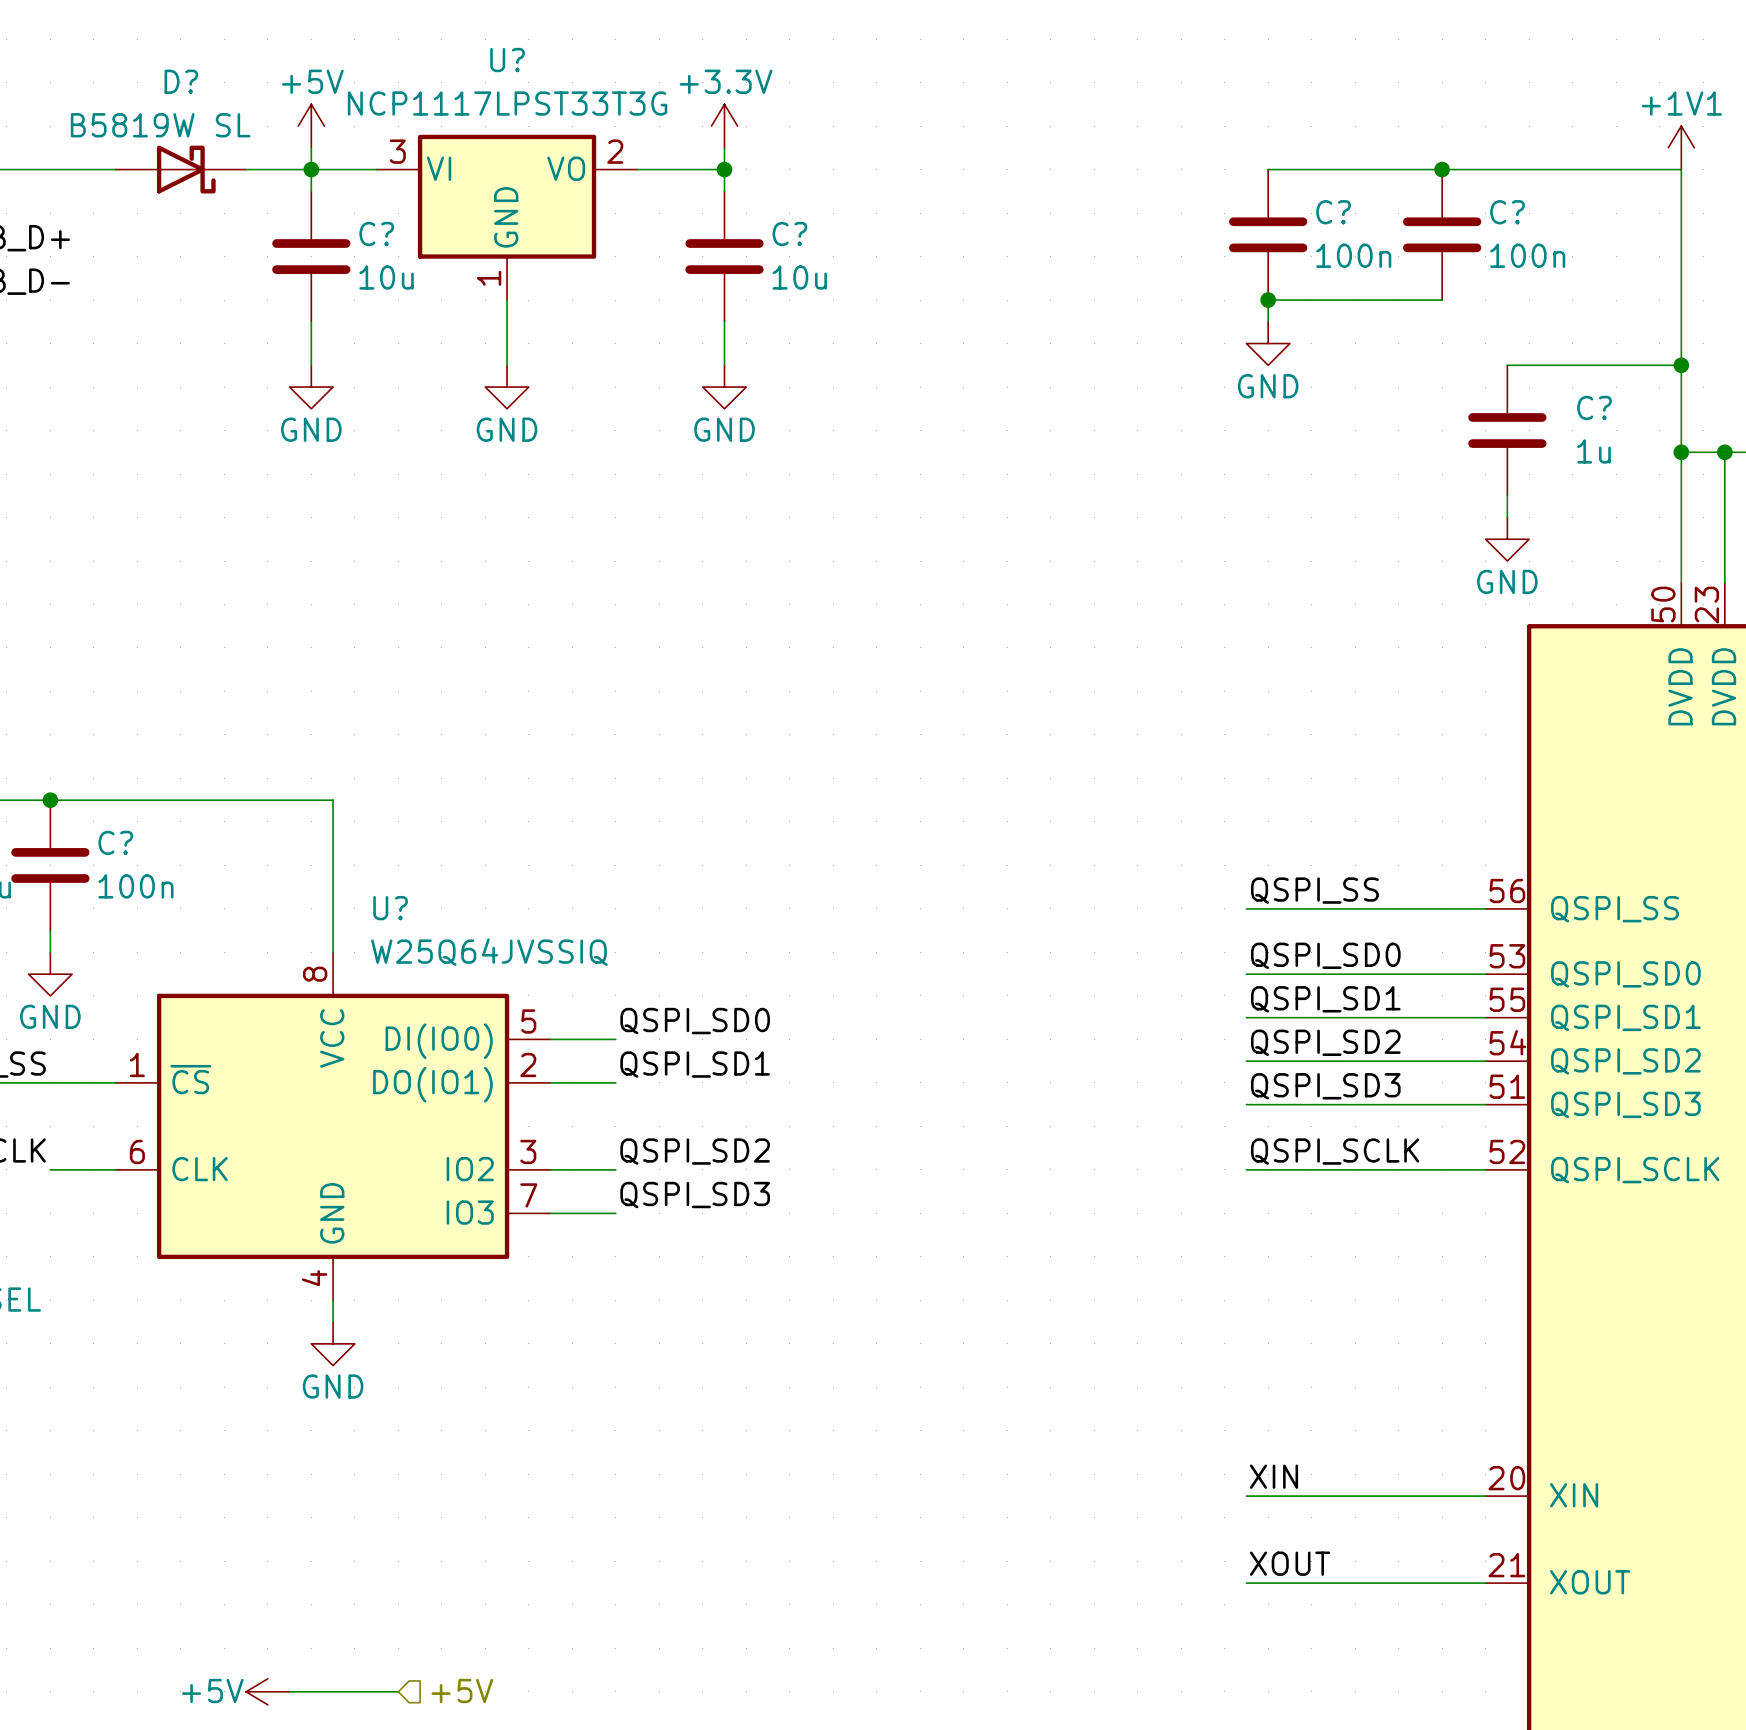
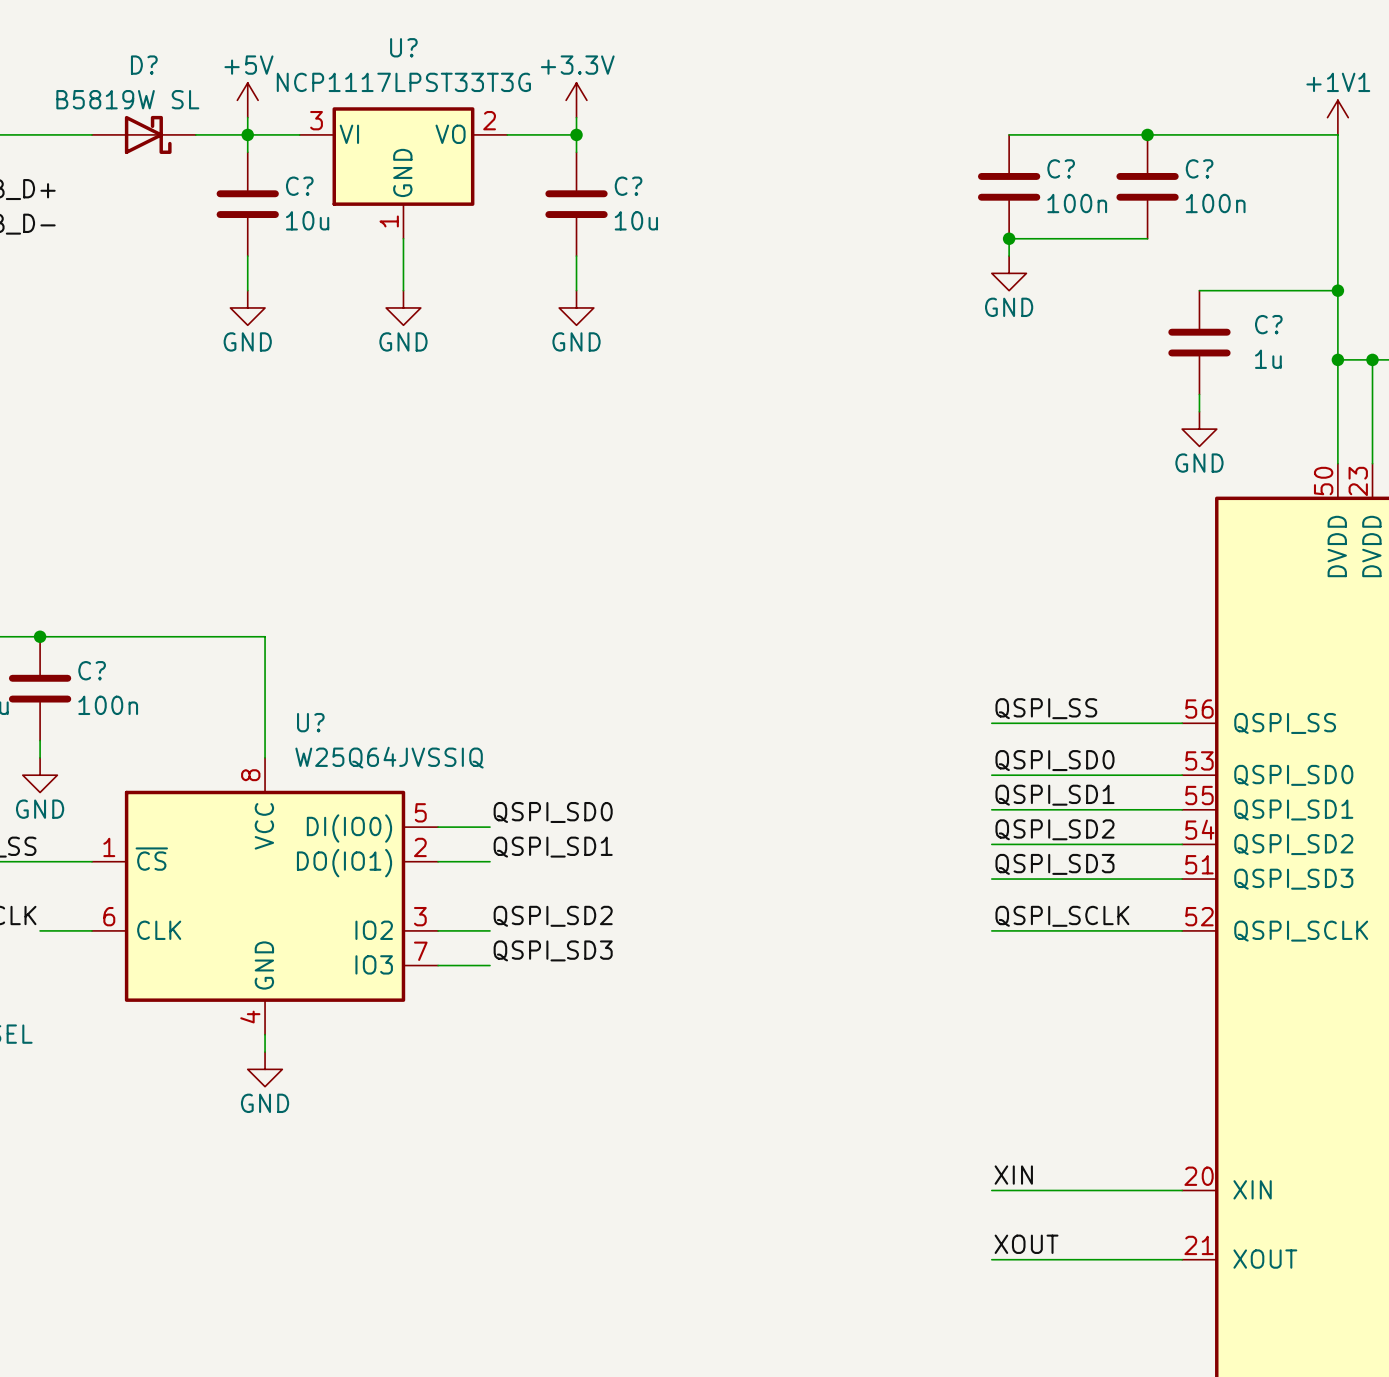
power symbol: +5V (267, 1691) -> none
wire: (289, 1691) (398, 1691) -> none
hierarchical label: +5V (462, 1691) -> none

